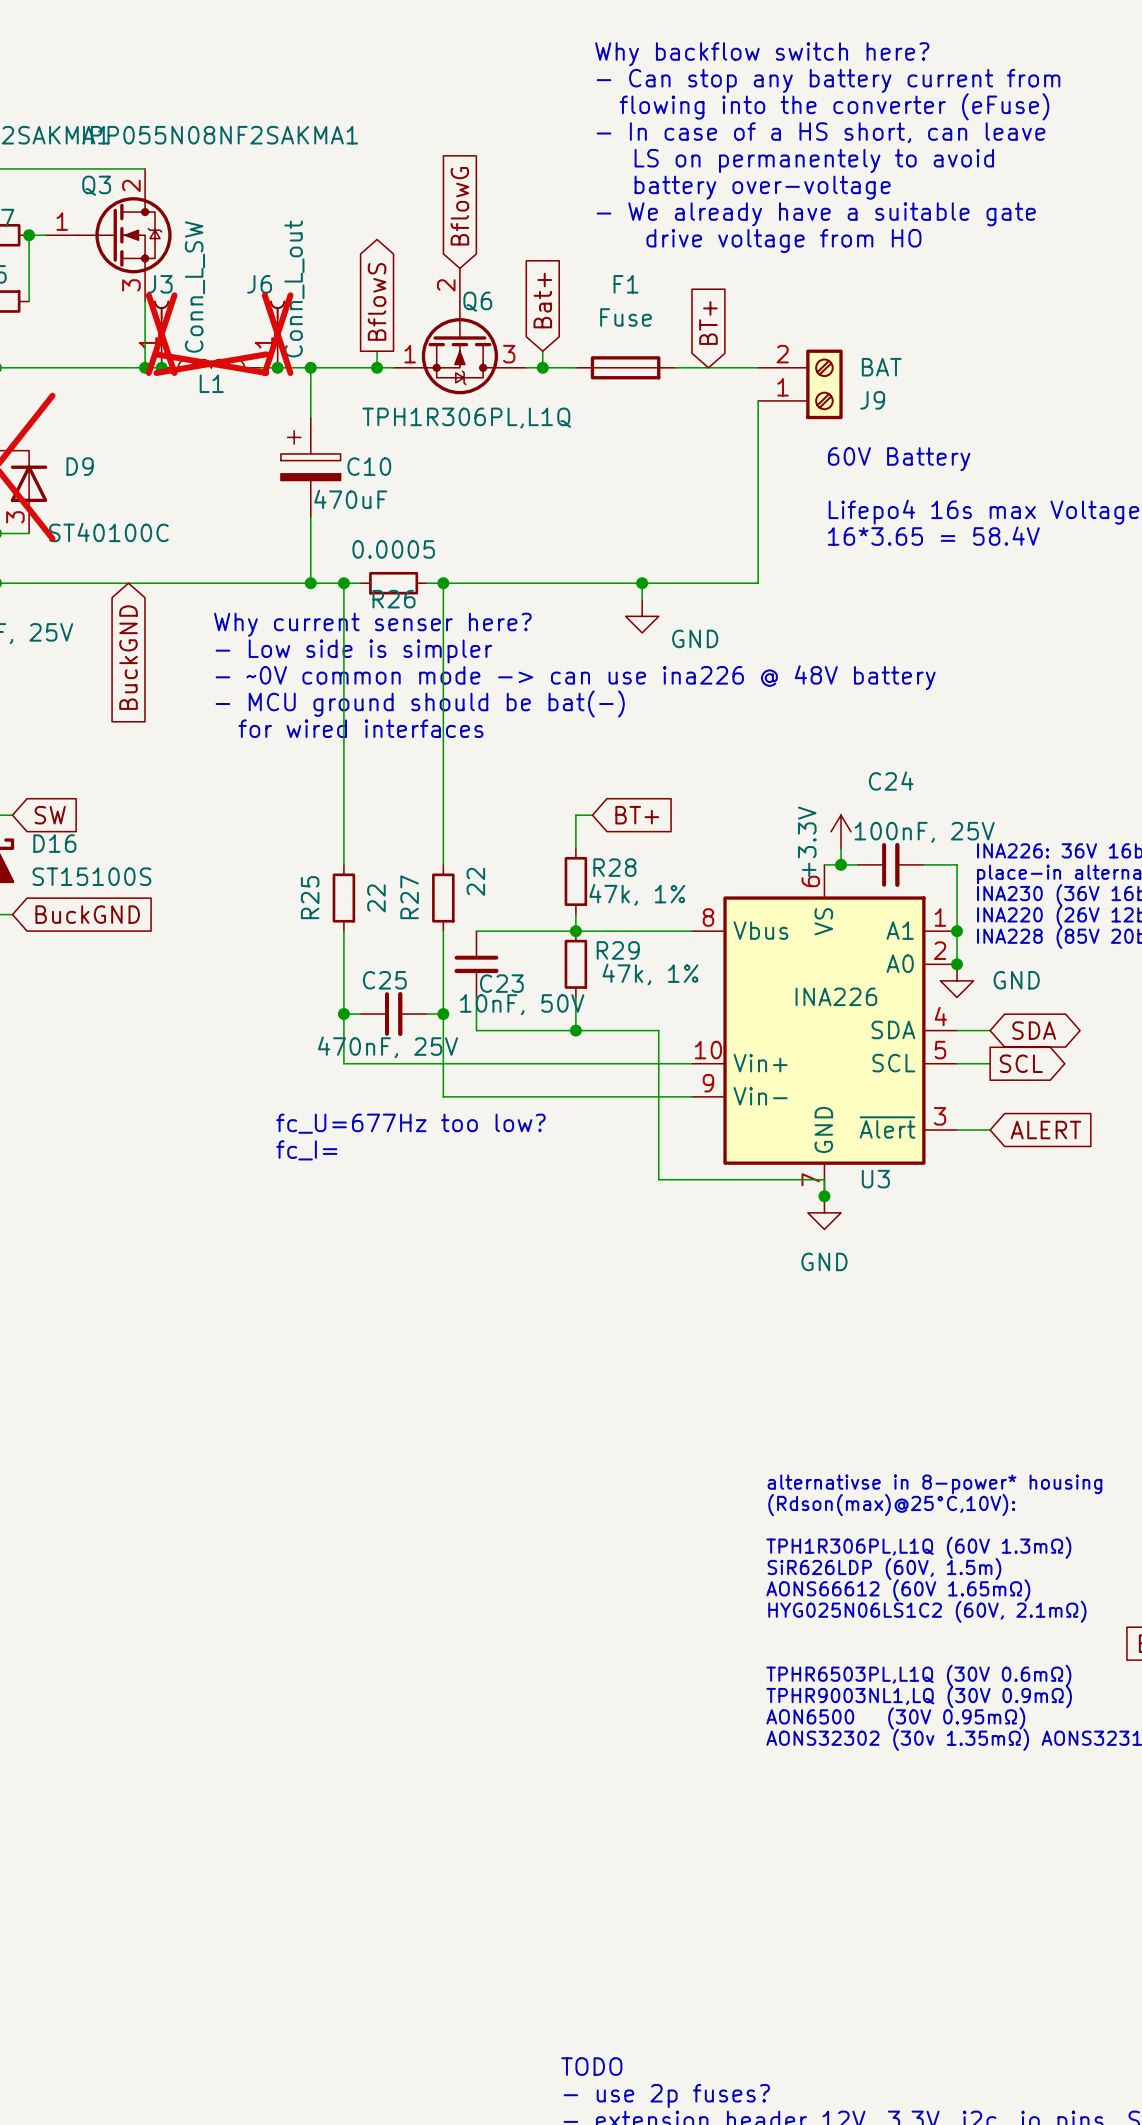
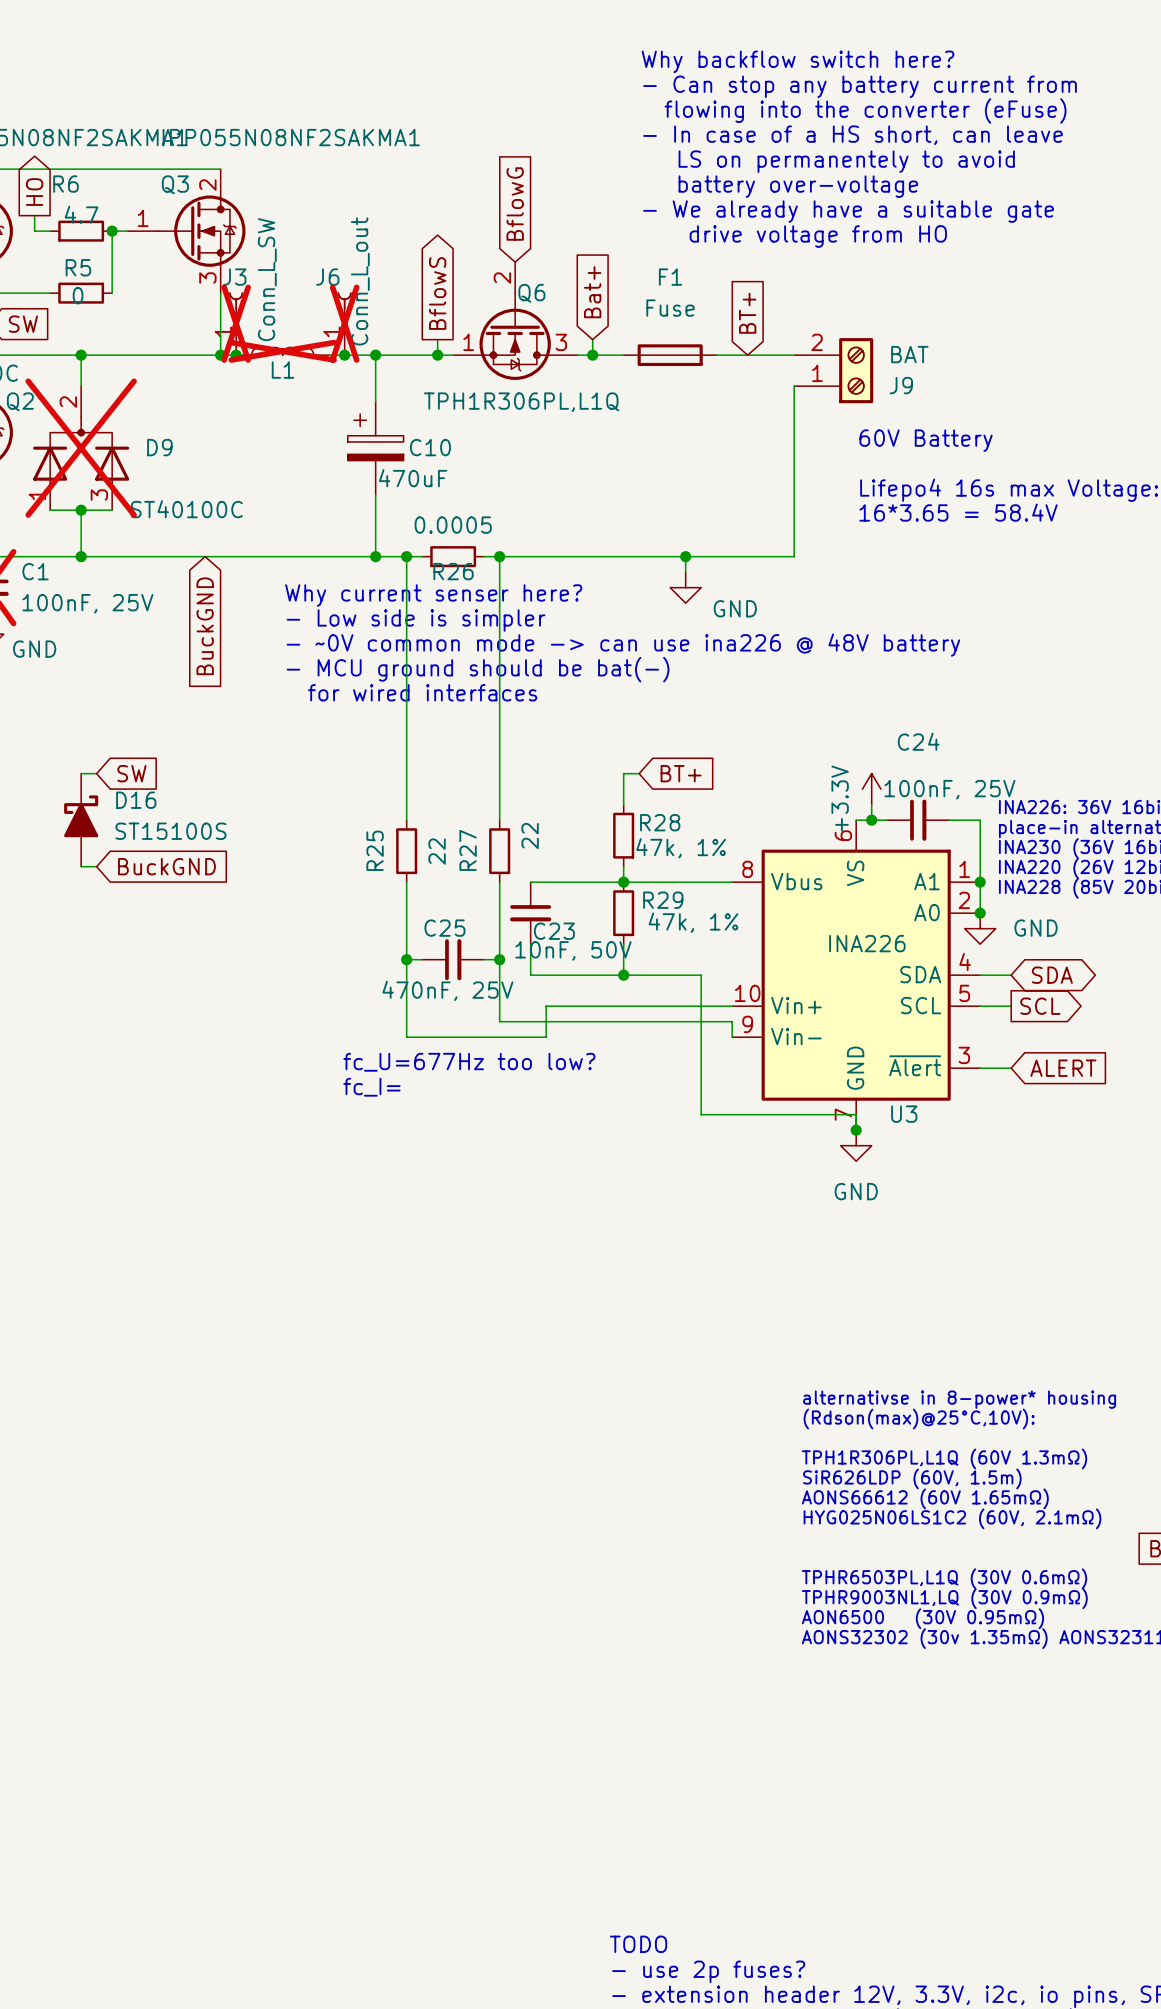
wire: (343, 1063) (493, 1063) -> (406, 1006) (406, 1037) (499, 1037)
wire: none -> (546, 1006) (546, 1037)
wire: (443, 1080) (443, 1096) -> none
wire: (493, 1096) (691, 1096) -> (499, 1021) (732, 1021) (732, 1037)

